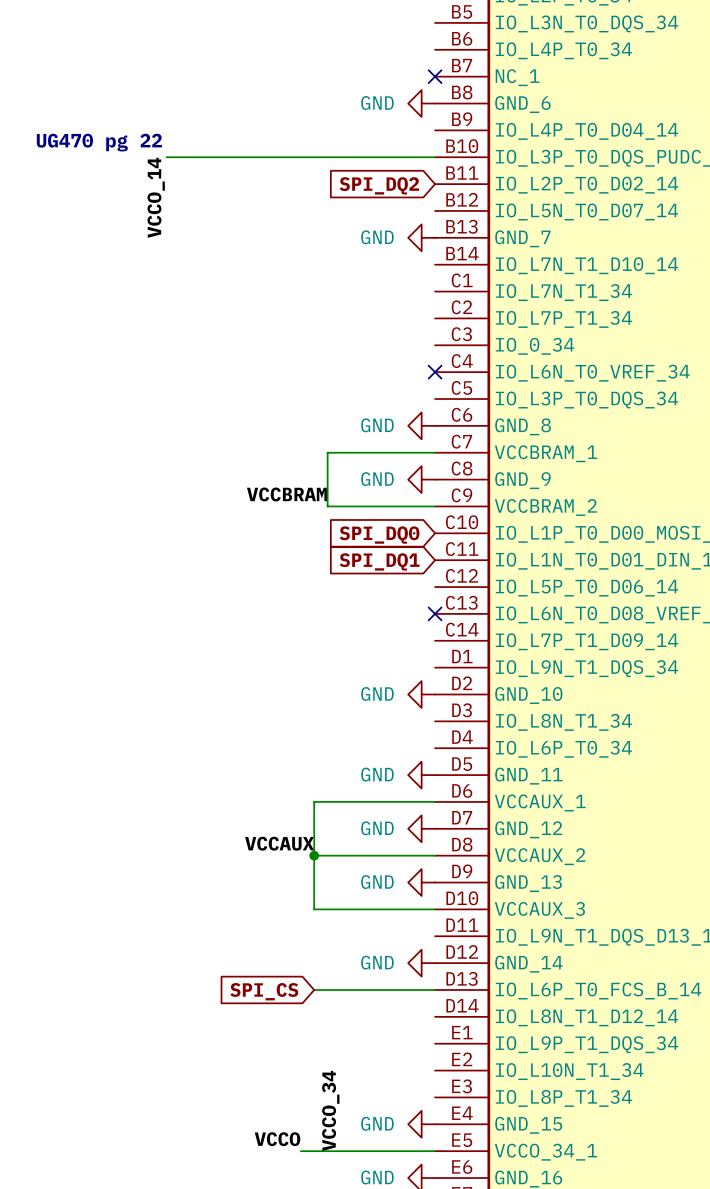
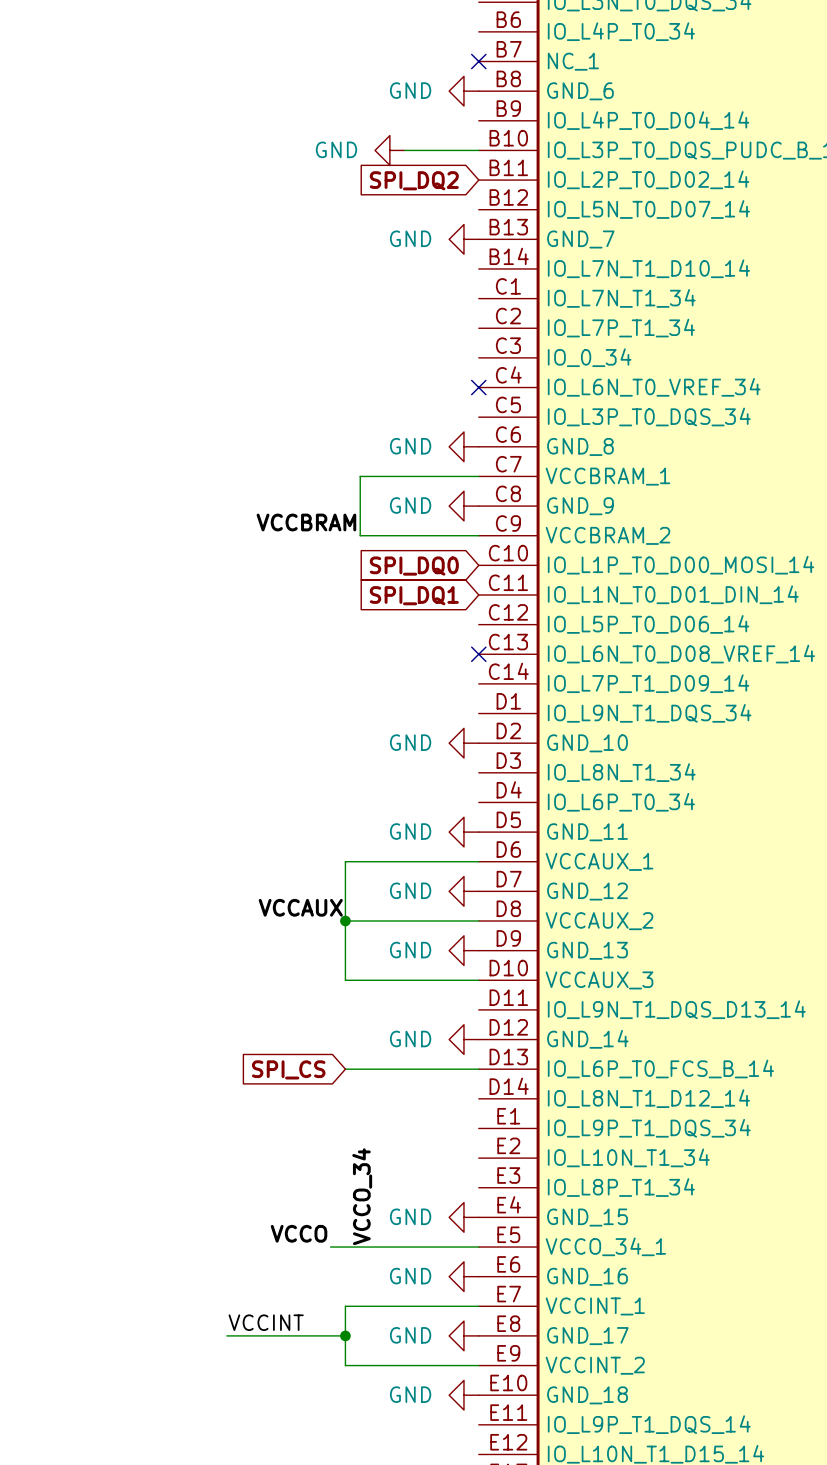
text: UG470 pg 22 (99, 142) -> none
wire: (166, 157) (367, 157) -> none
power symbol: none -> GND (389, 150)
label: VCCO_14 (156, 197) -> none

